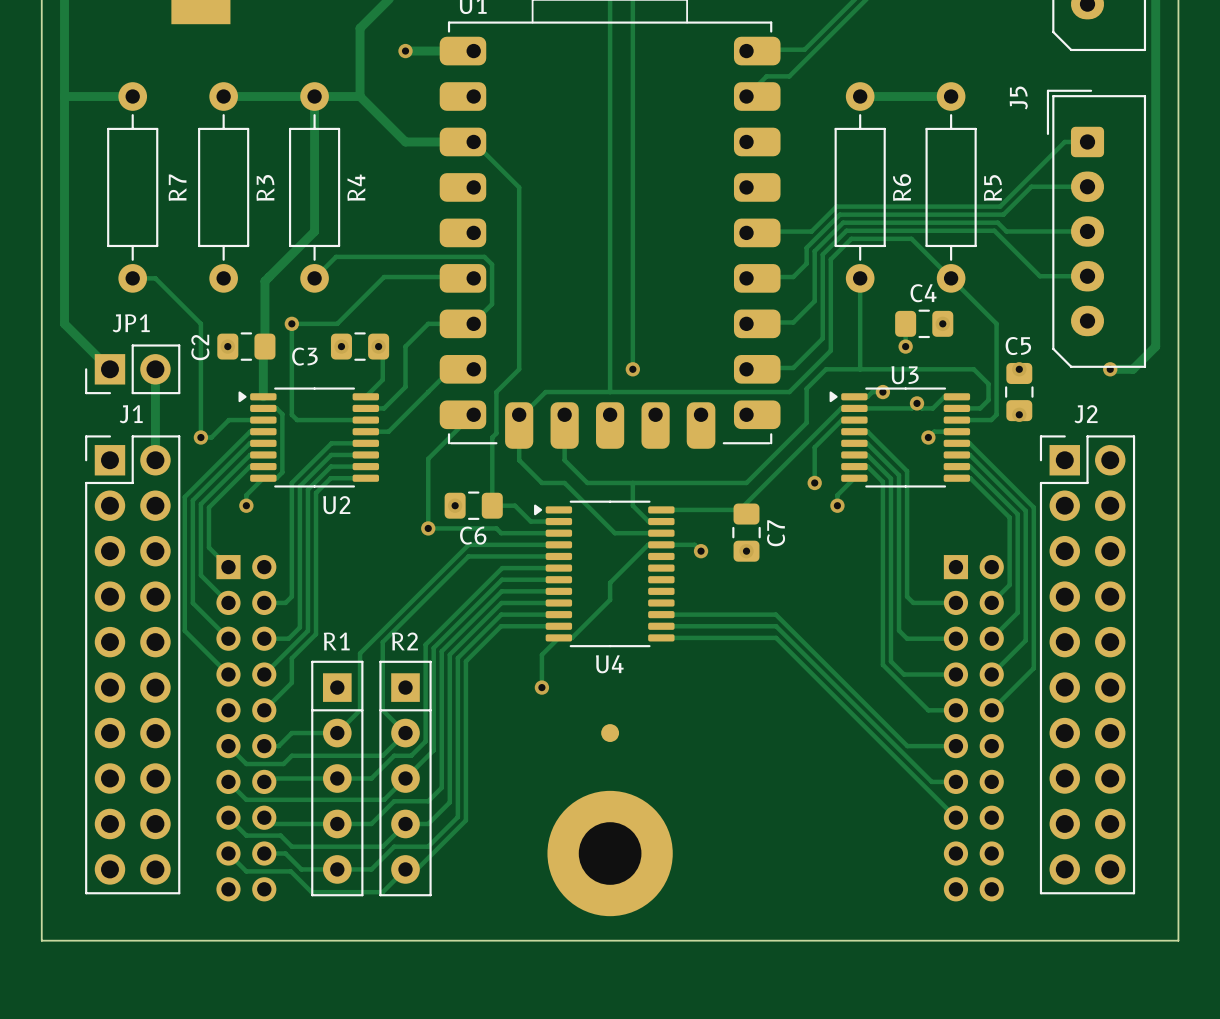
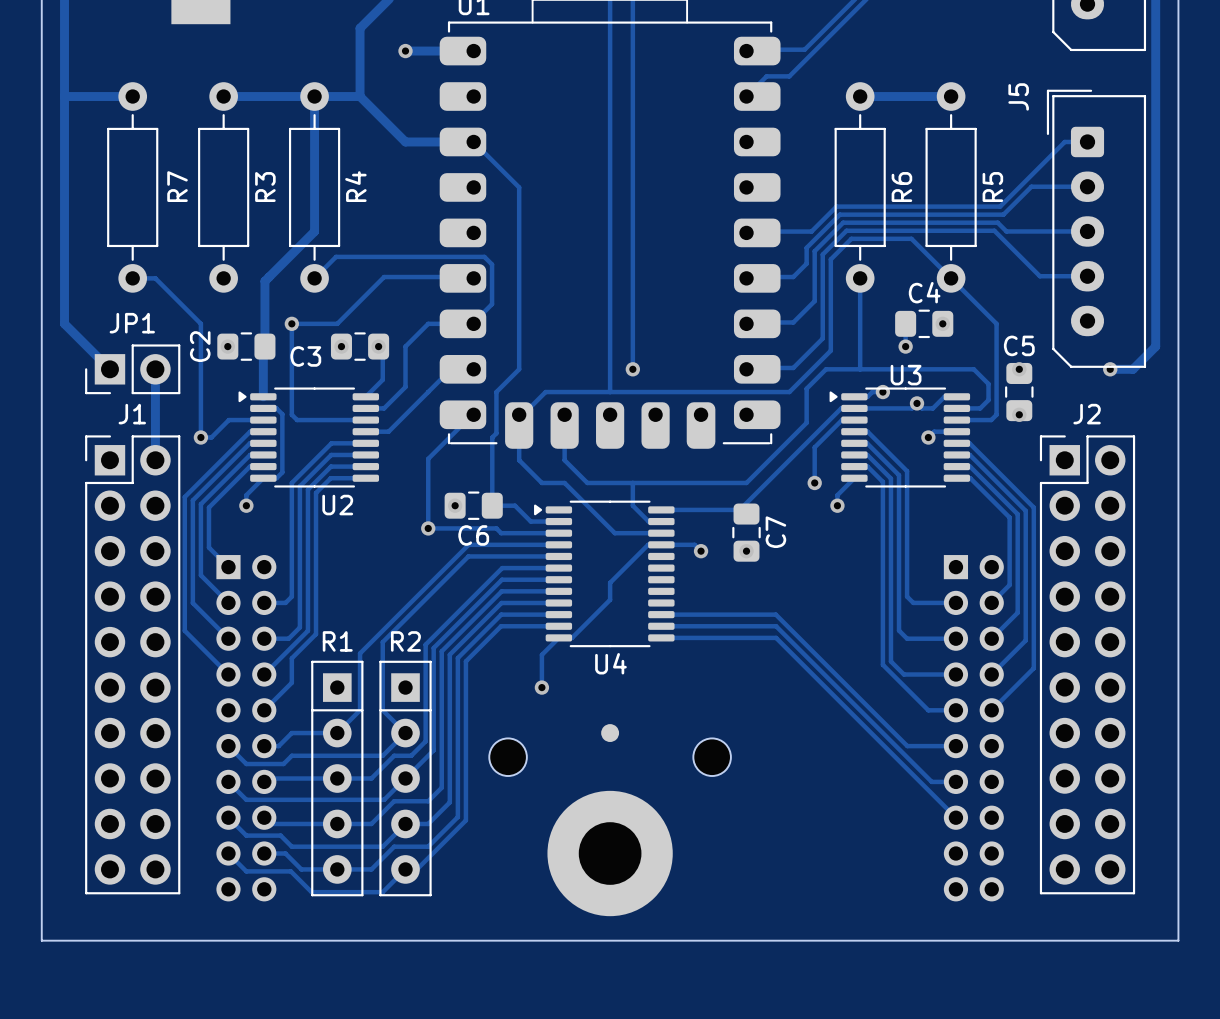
part: none -> (508, 757)
part: none -> (712, 757)

